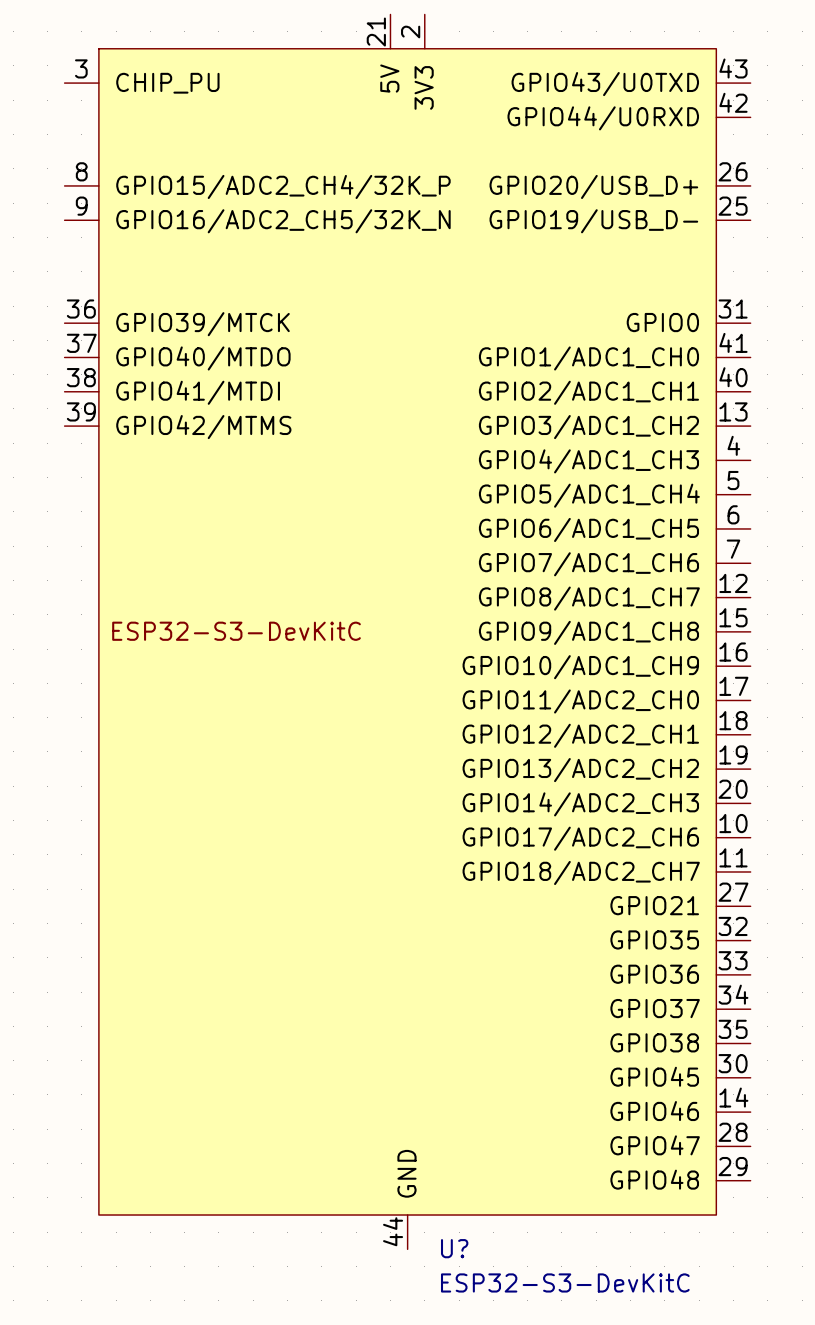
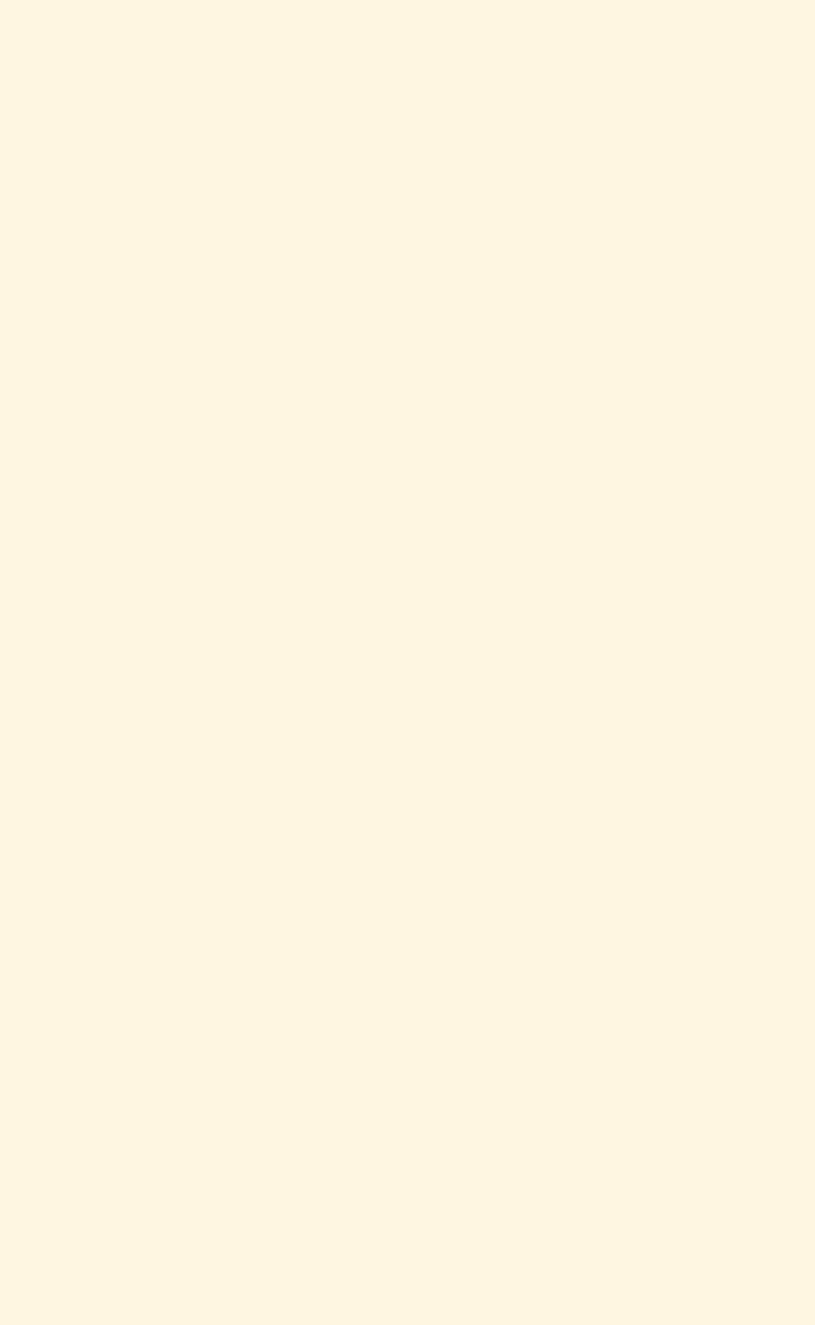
U?: ESP32-S3-DevKitC (407, 631) -> none

